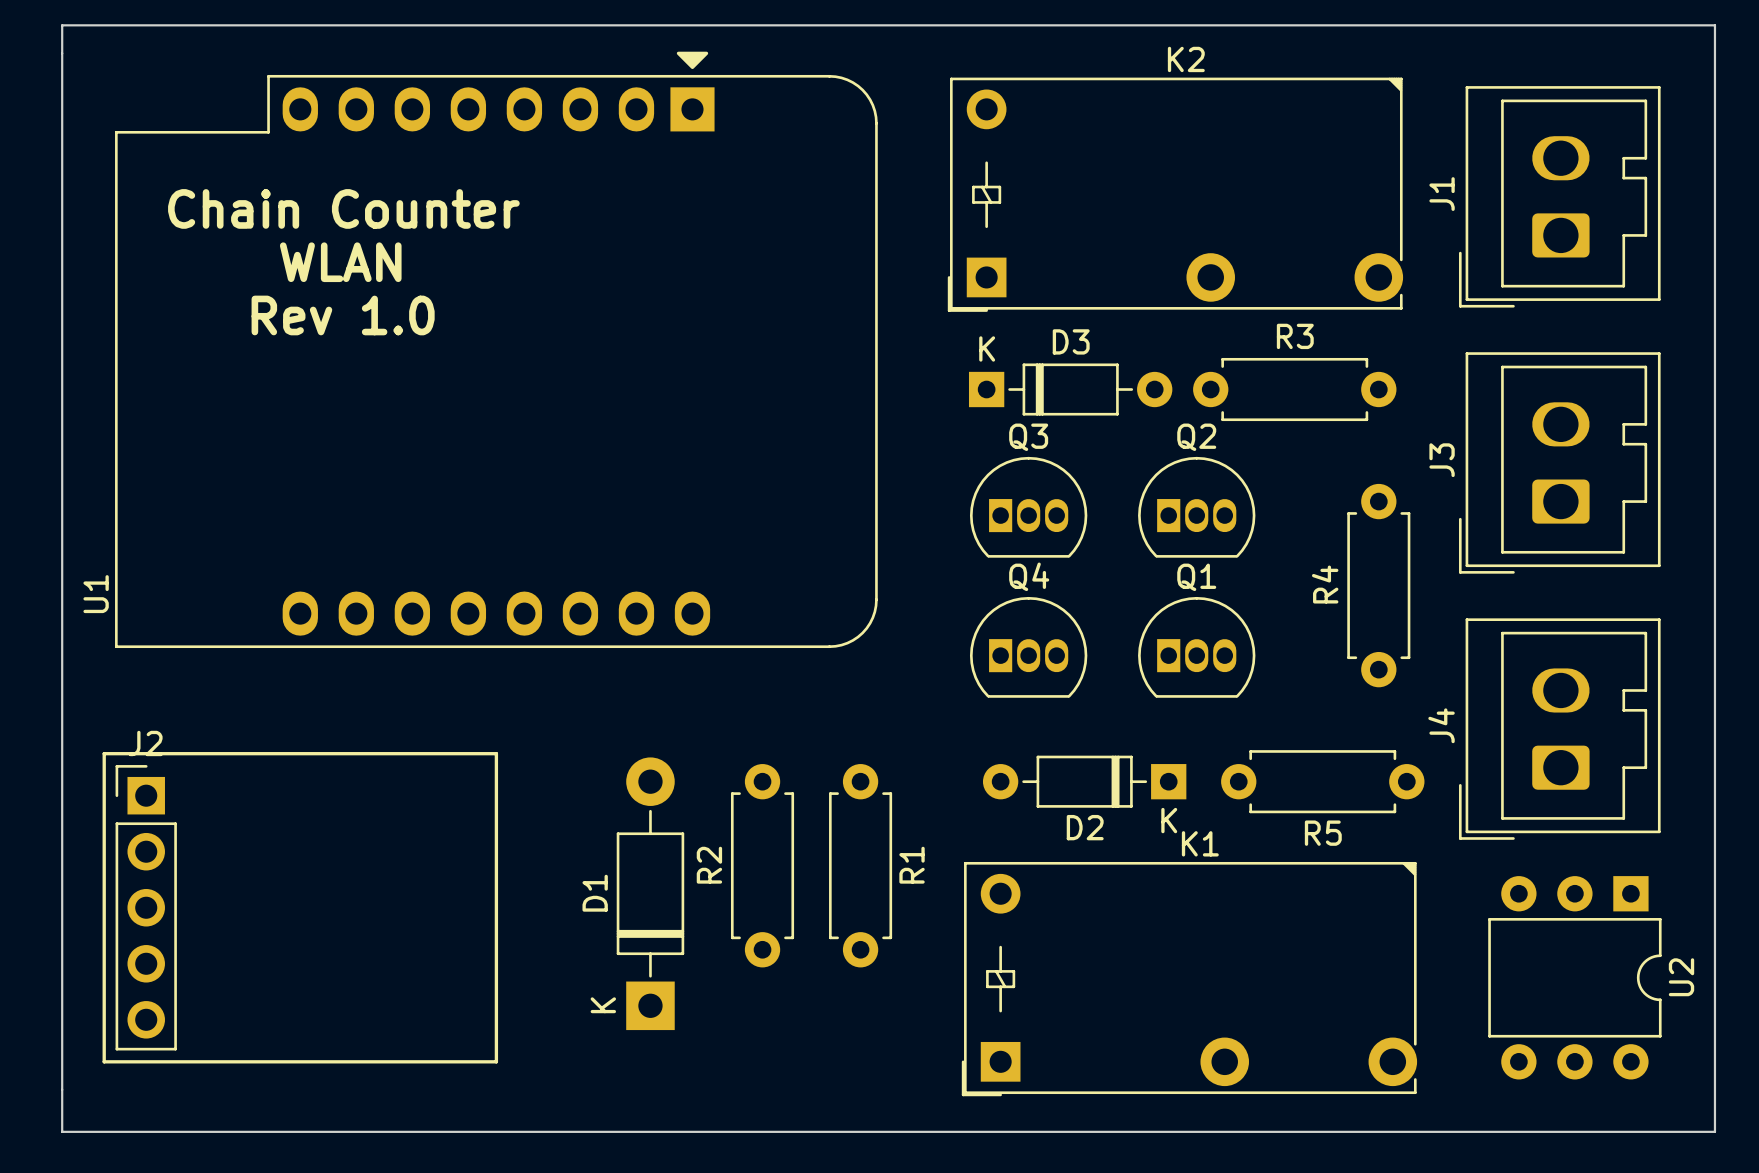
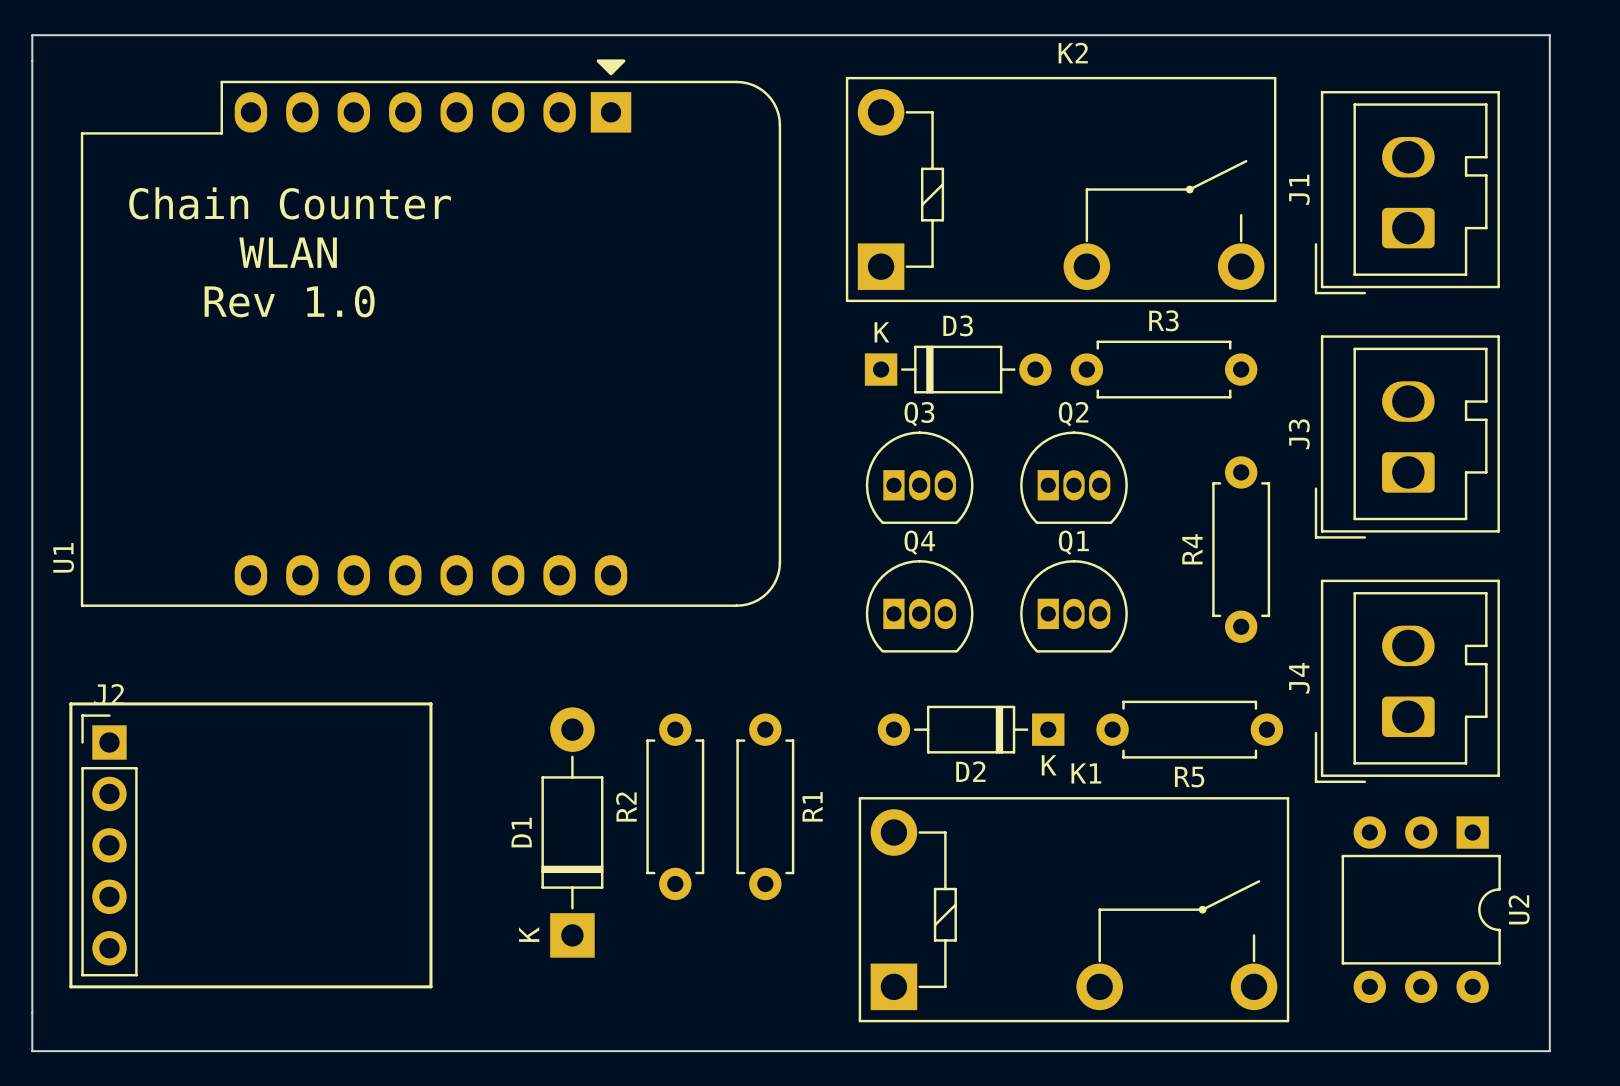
K2 footprint: [947, 77, 1404, 312] -> [845, 76, 1277, 303]
K1 footprint: [961, 861, 1418, 1097] -> [858, 797, 1290, 1023]

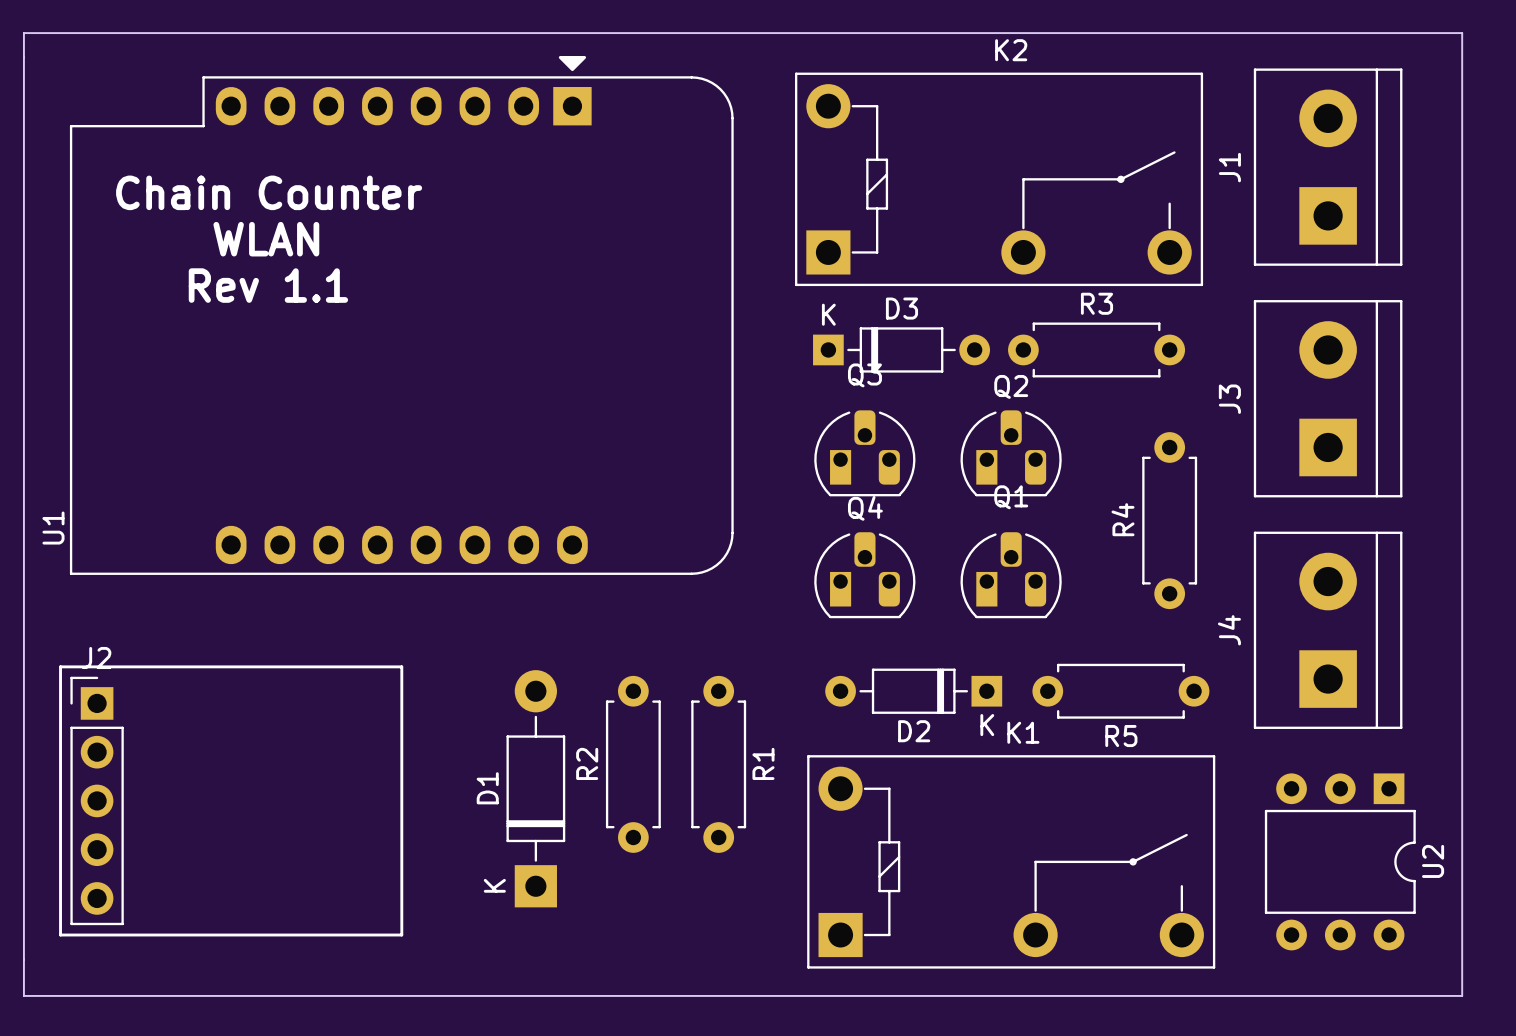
J1 footprint: [1314, 90, 1500, 295] -> [1253, 68, 1403, 266]
text: Rev 1.0 (289, 301) -> Rev 1.1 (268, 285)
J3 footprint: [1314, 335, 1500, 539] -> [1253, 300, 1403, 498]
Q3 footprint: [865, 431, 974, 524] -> [814, 410, 916, 497]
Q2 footprint: [1020, 431, 1128, 524] -> [960, 410, 1062, 497]
Q4 footprint: [865, 560, 974, 653] -> [814, 532, 916, 619]
Q1 footprint: [1020, 560, 1128, 653] -> [960, 532, 1062, 619]
J4 footprint: [1314, 579, 1500, 784] -> [1253, 531, 1403, 729]

